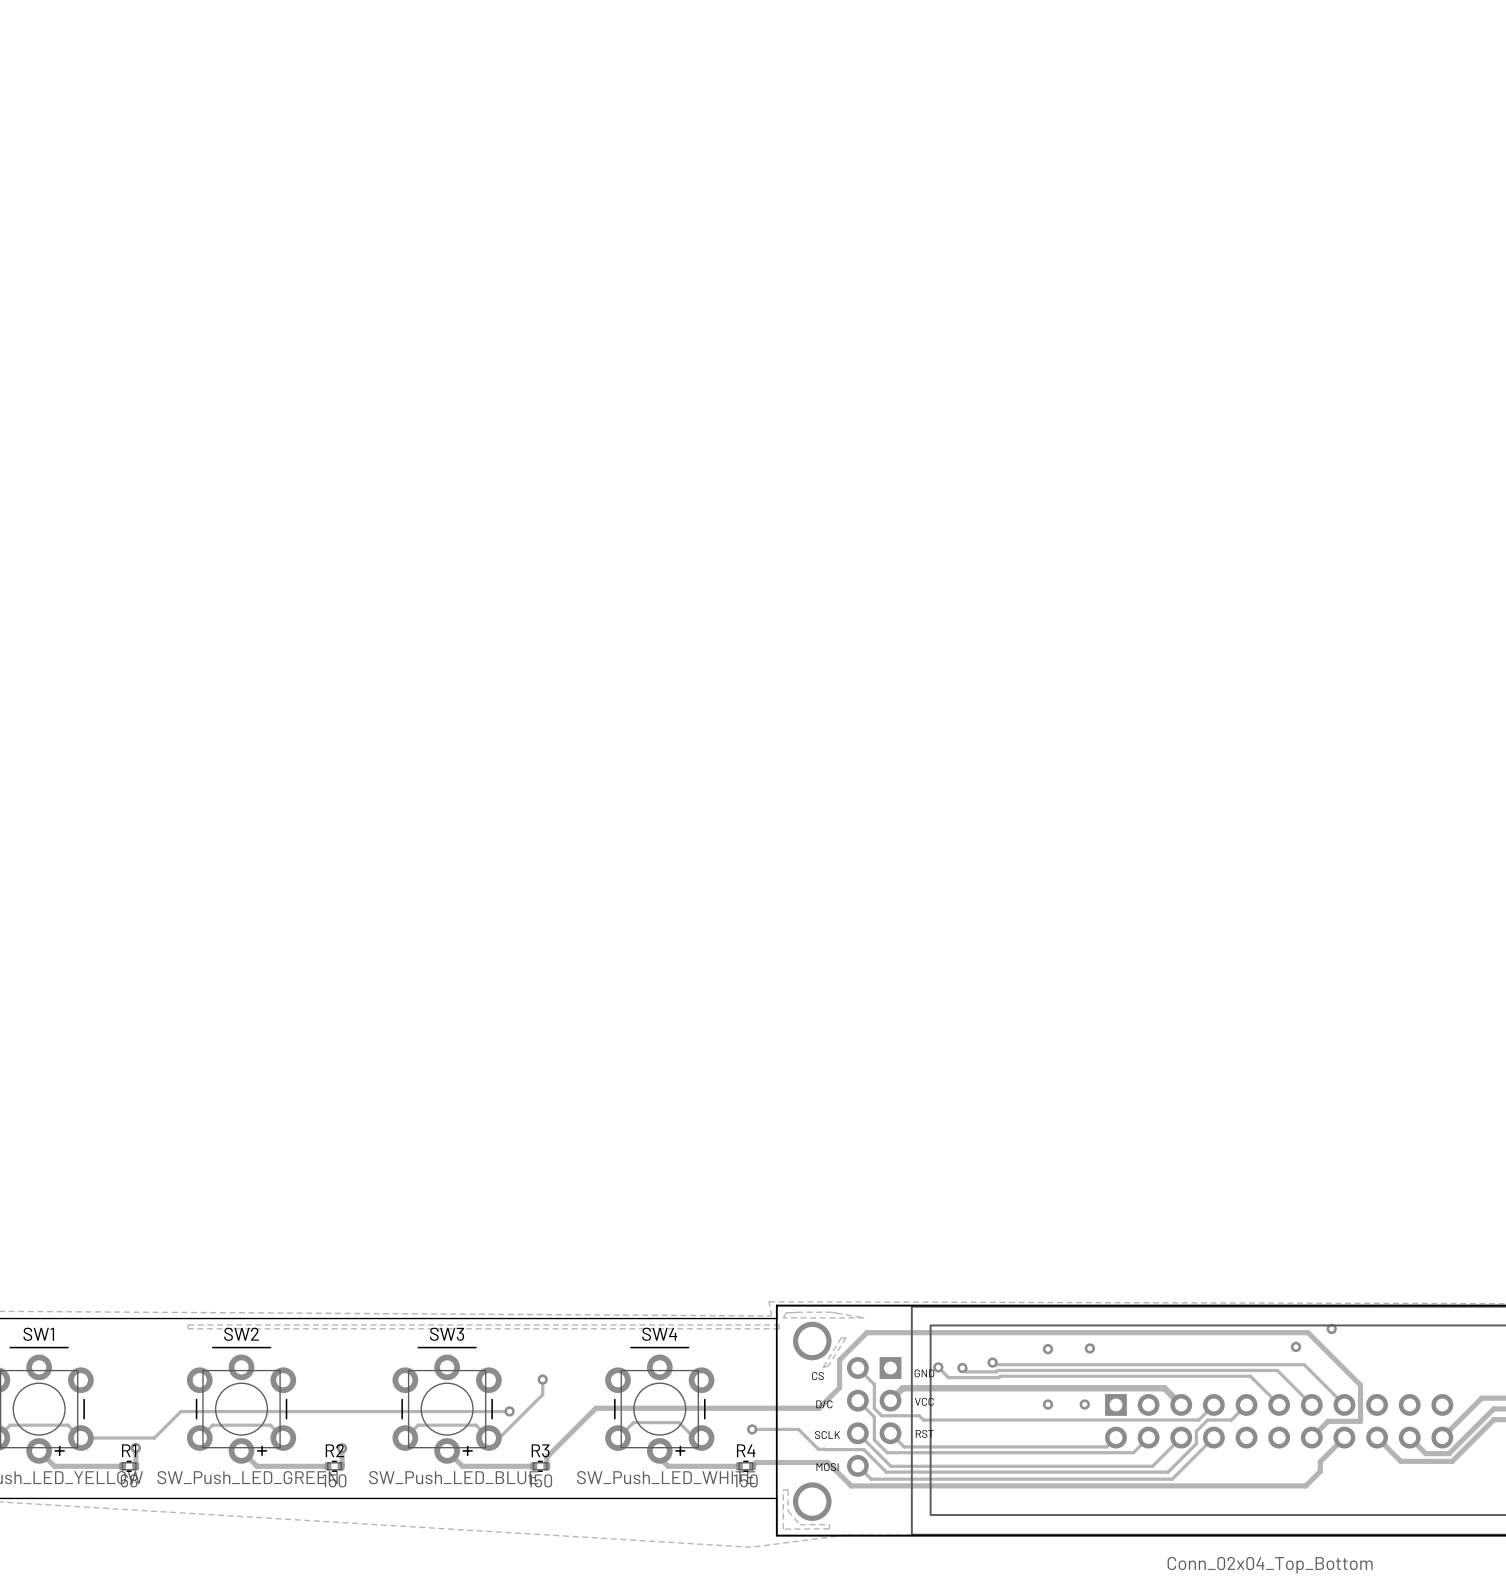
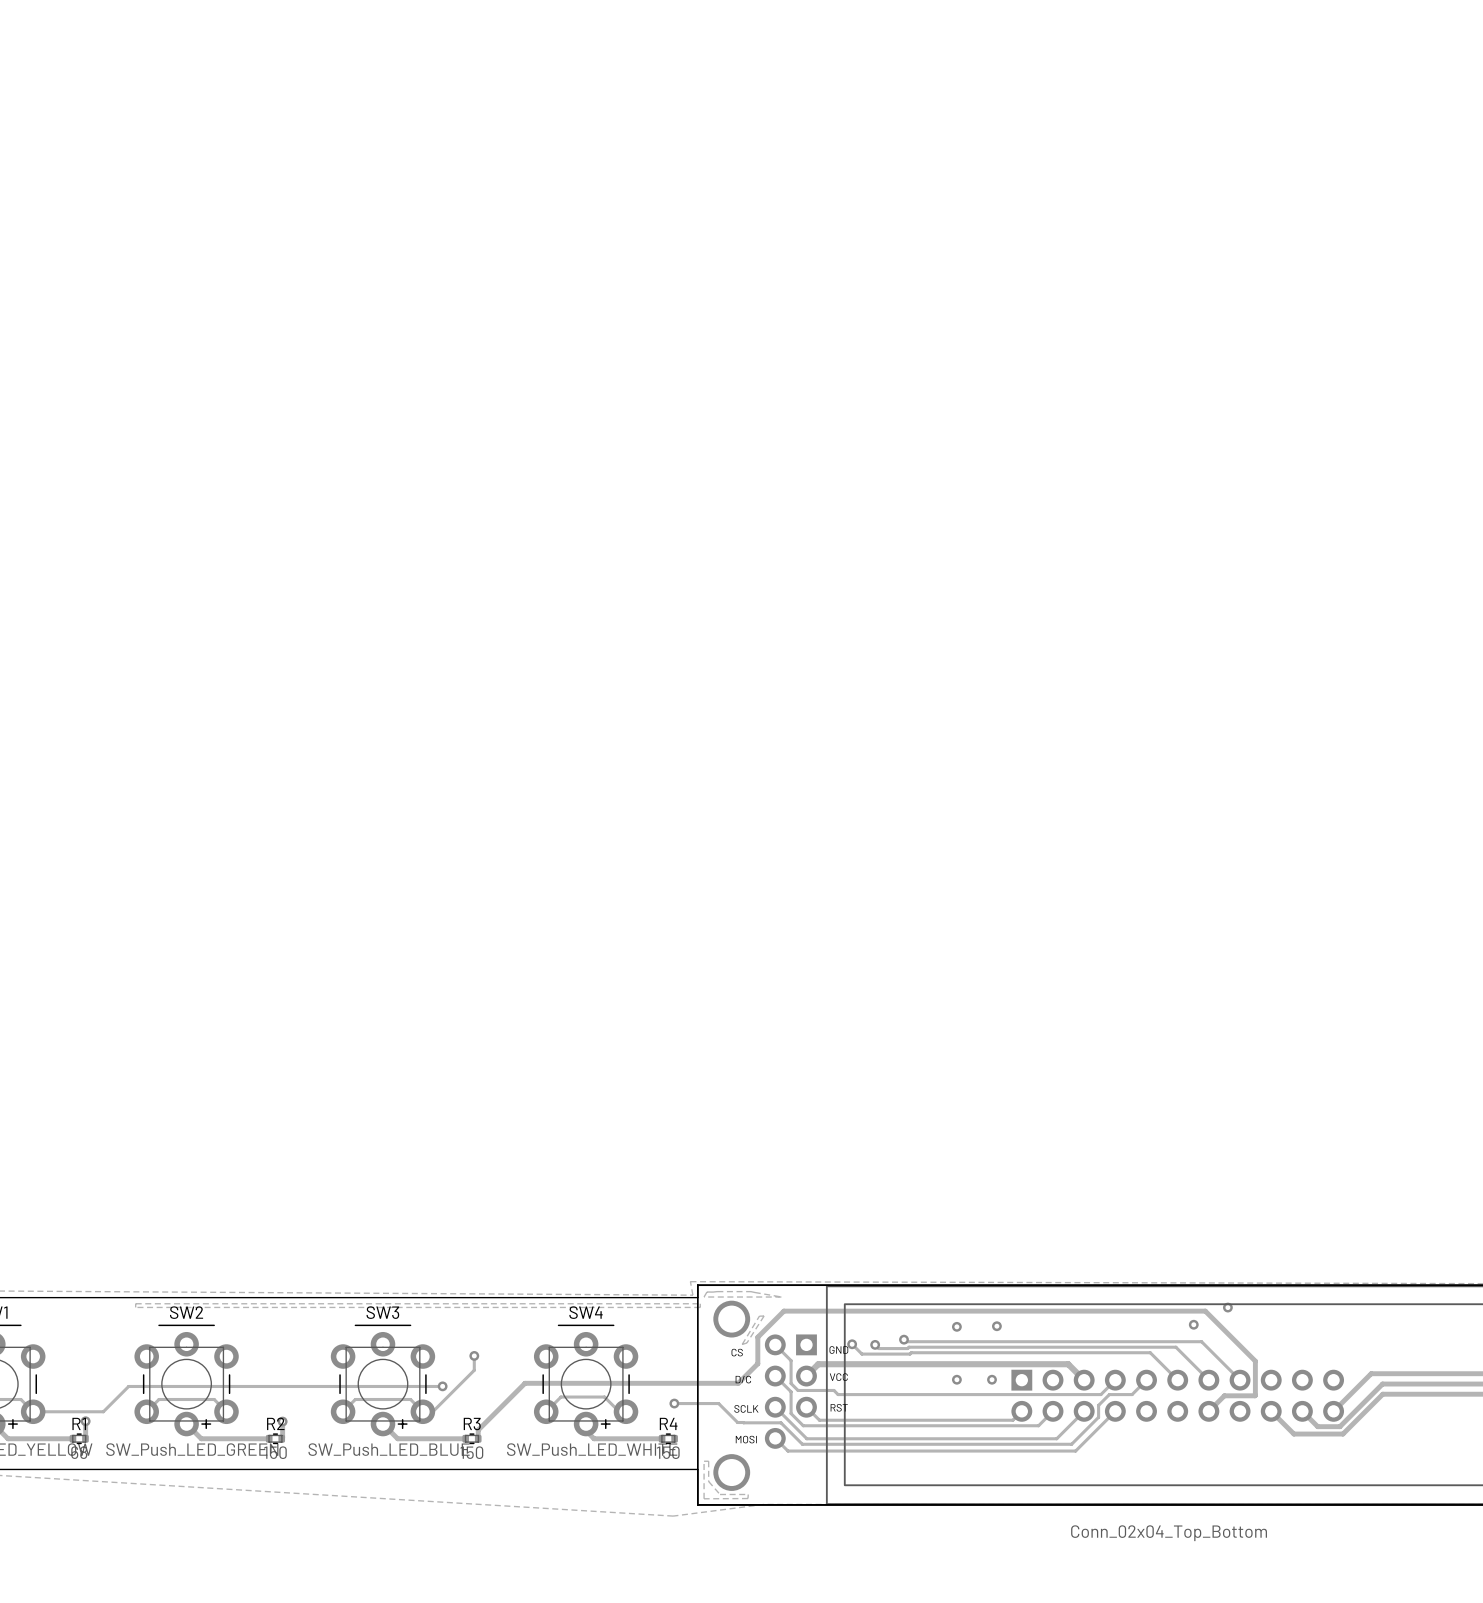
track: (1344, 1437) (1320, 1461) (1320, 1471) (1305, 1485) (851, 1485) (827, 1462) (756, 1462) (752, 1466) -> none

